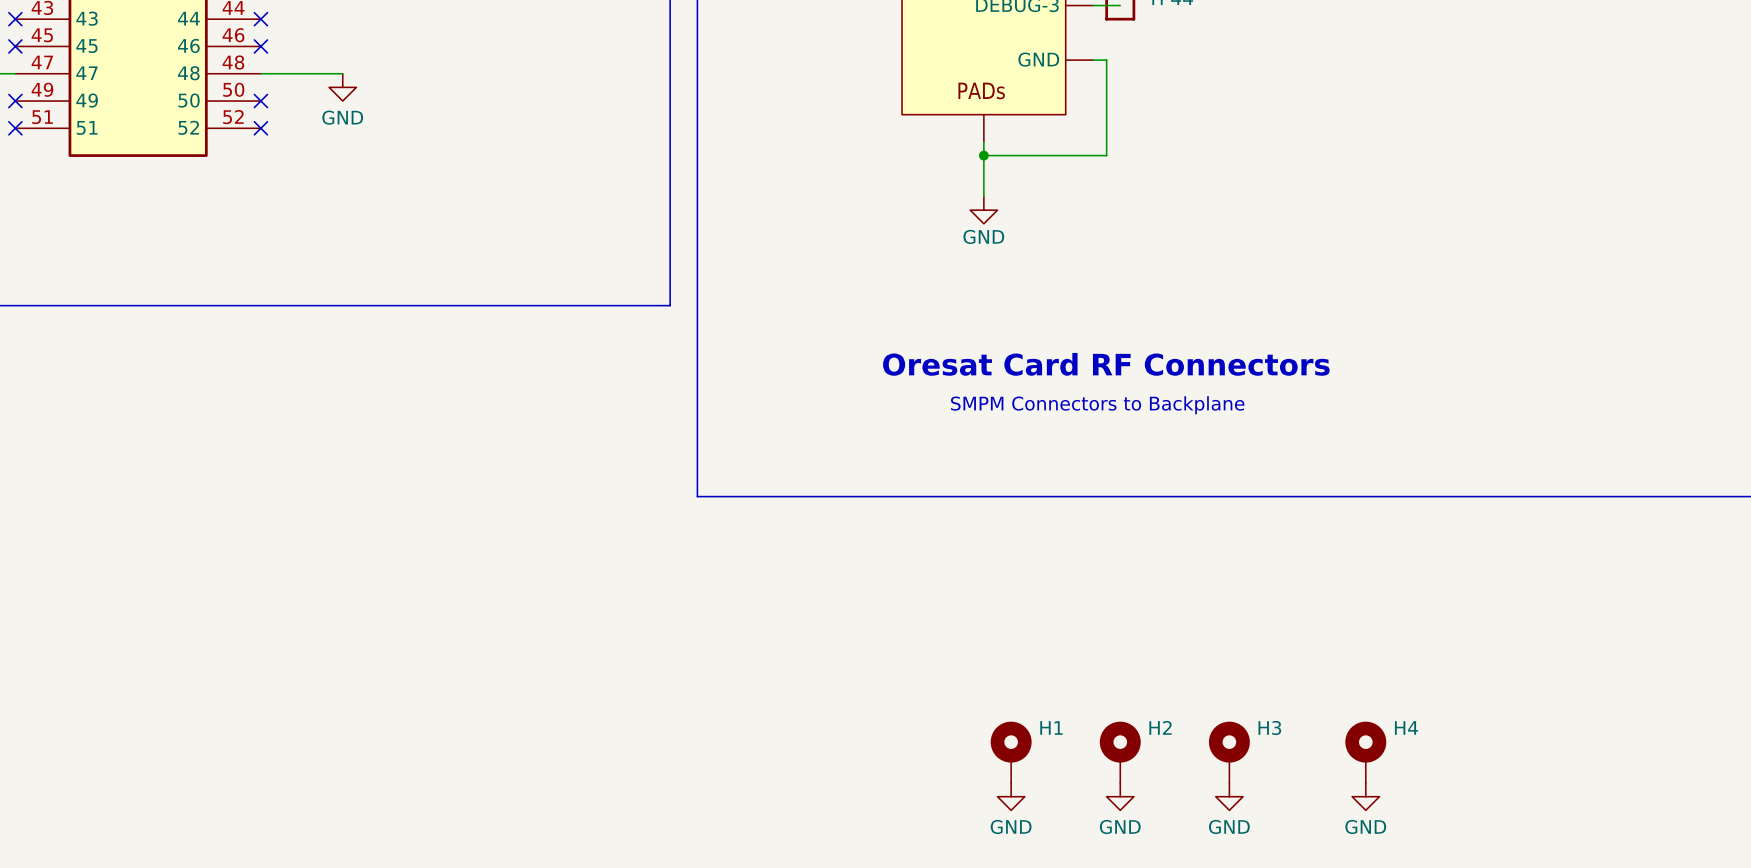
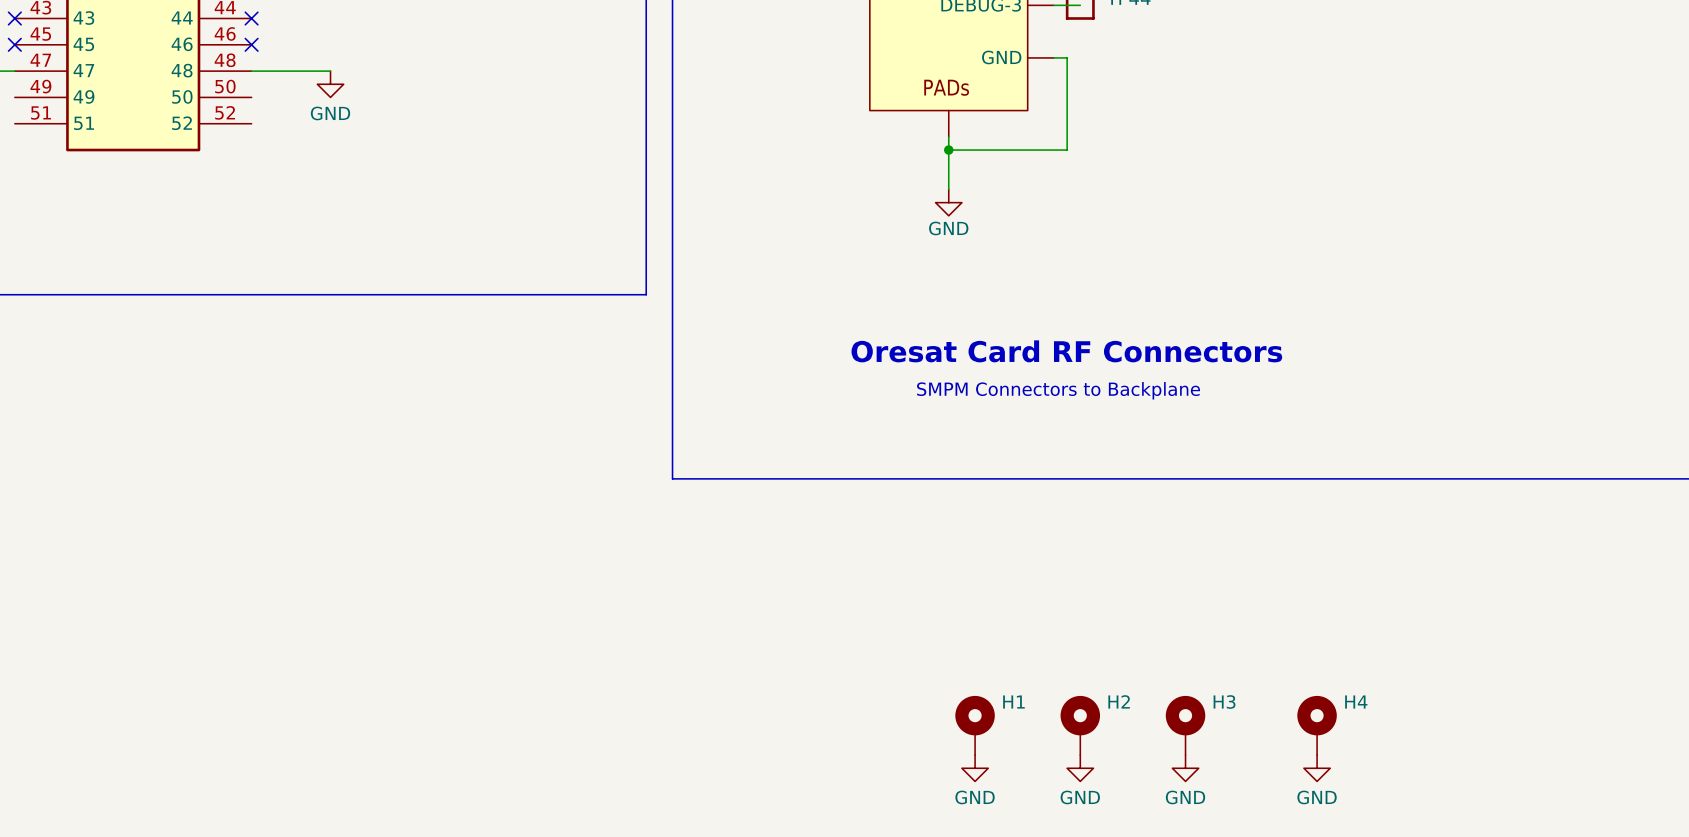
no-connect mark: (15, 101) -> none
no-connect mark: (260, 101) -> none
no-connect mark: (15, 128) -> none
no-connect mark: (260, 128) -> none

